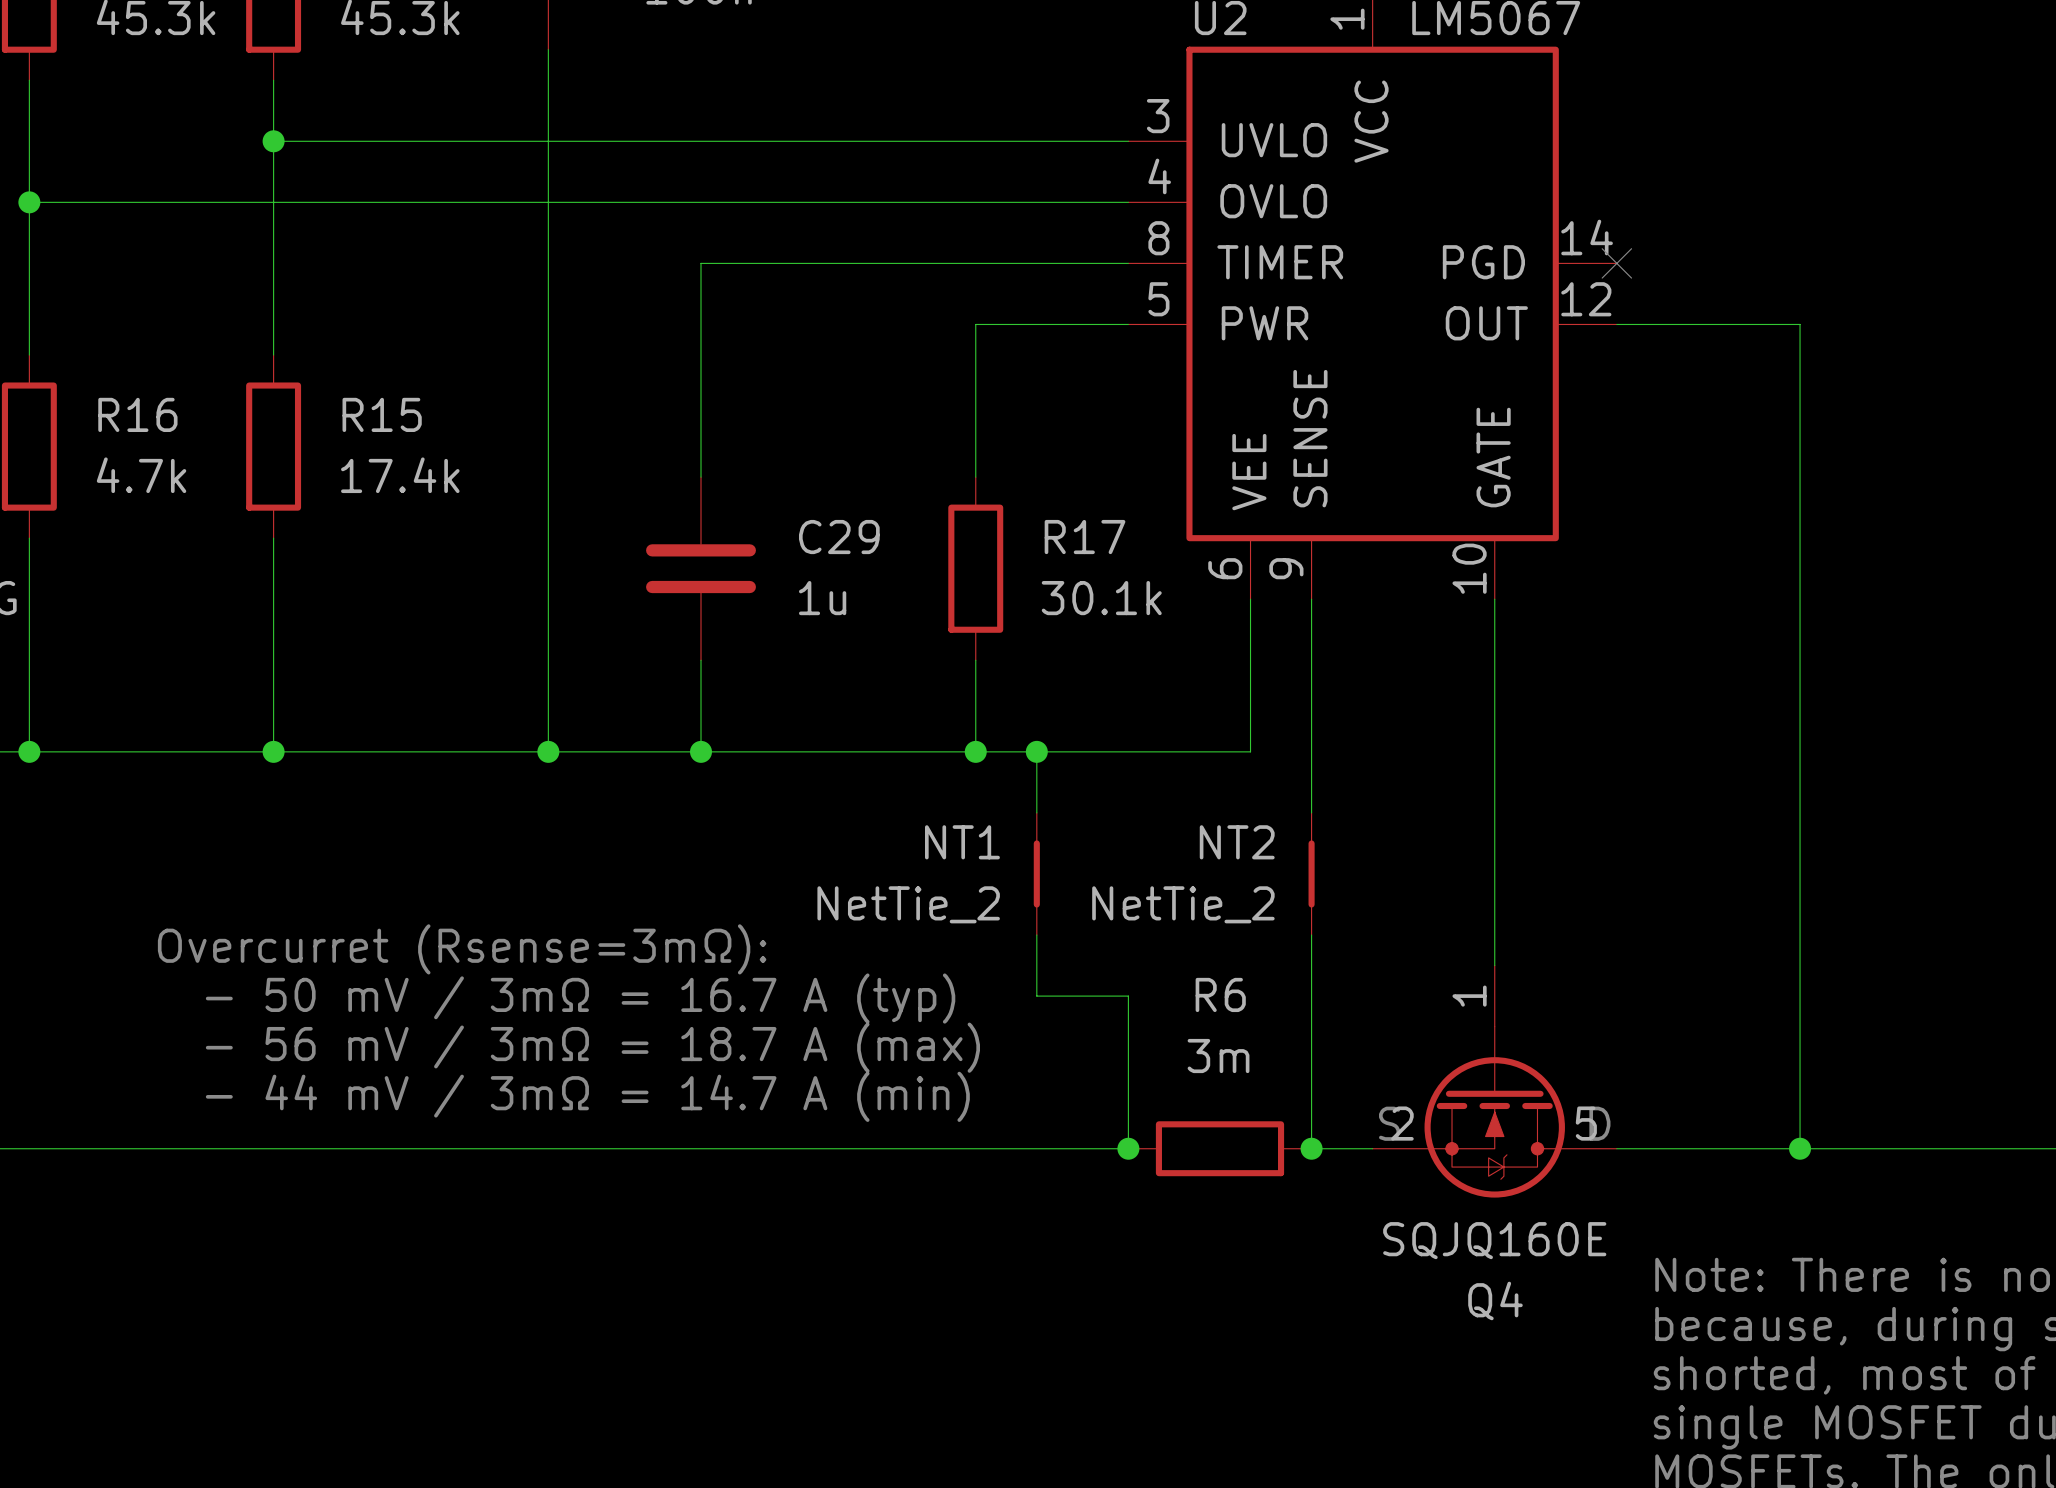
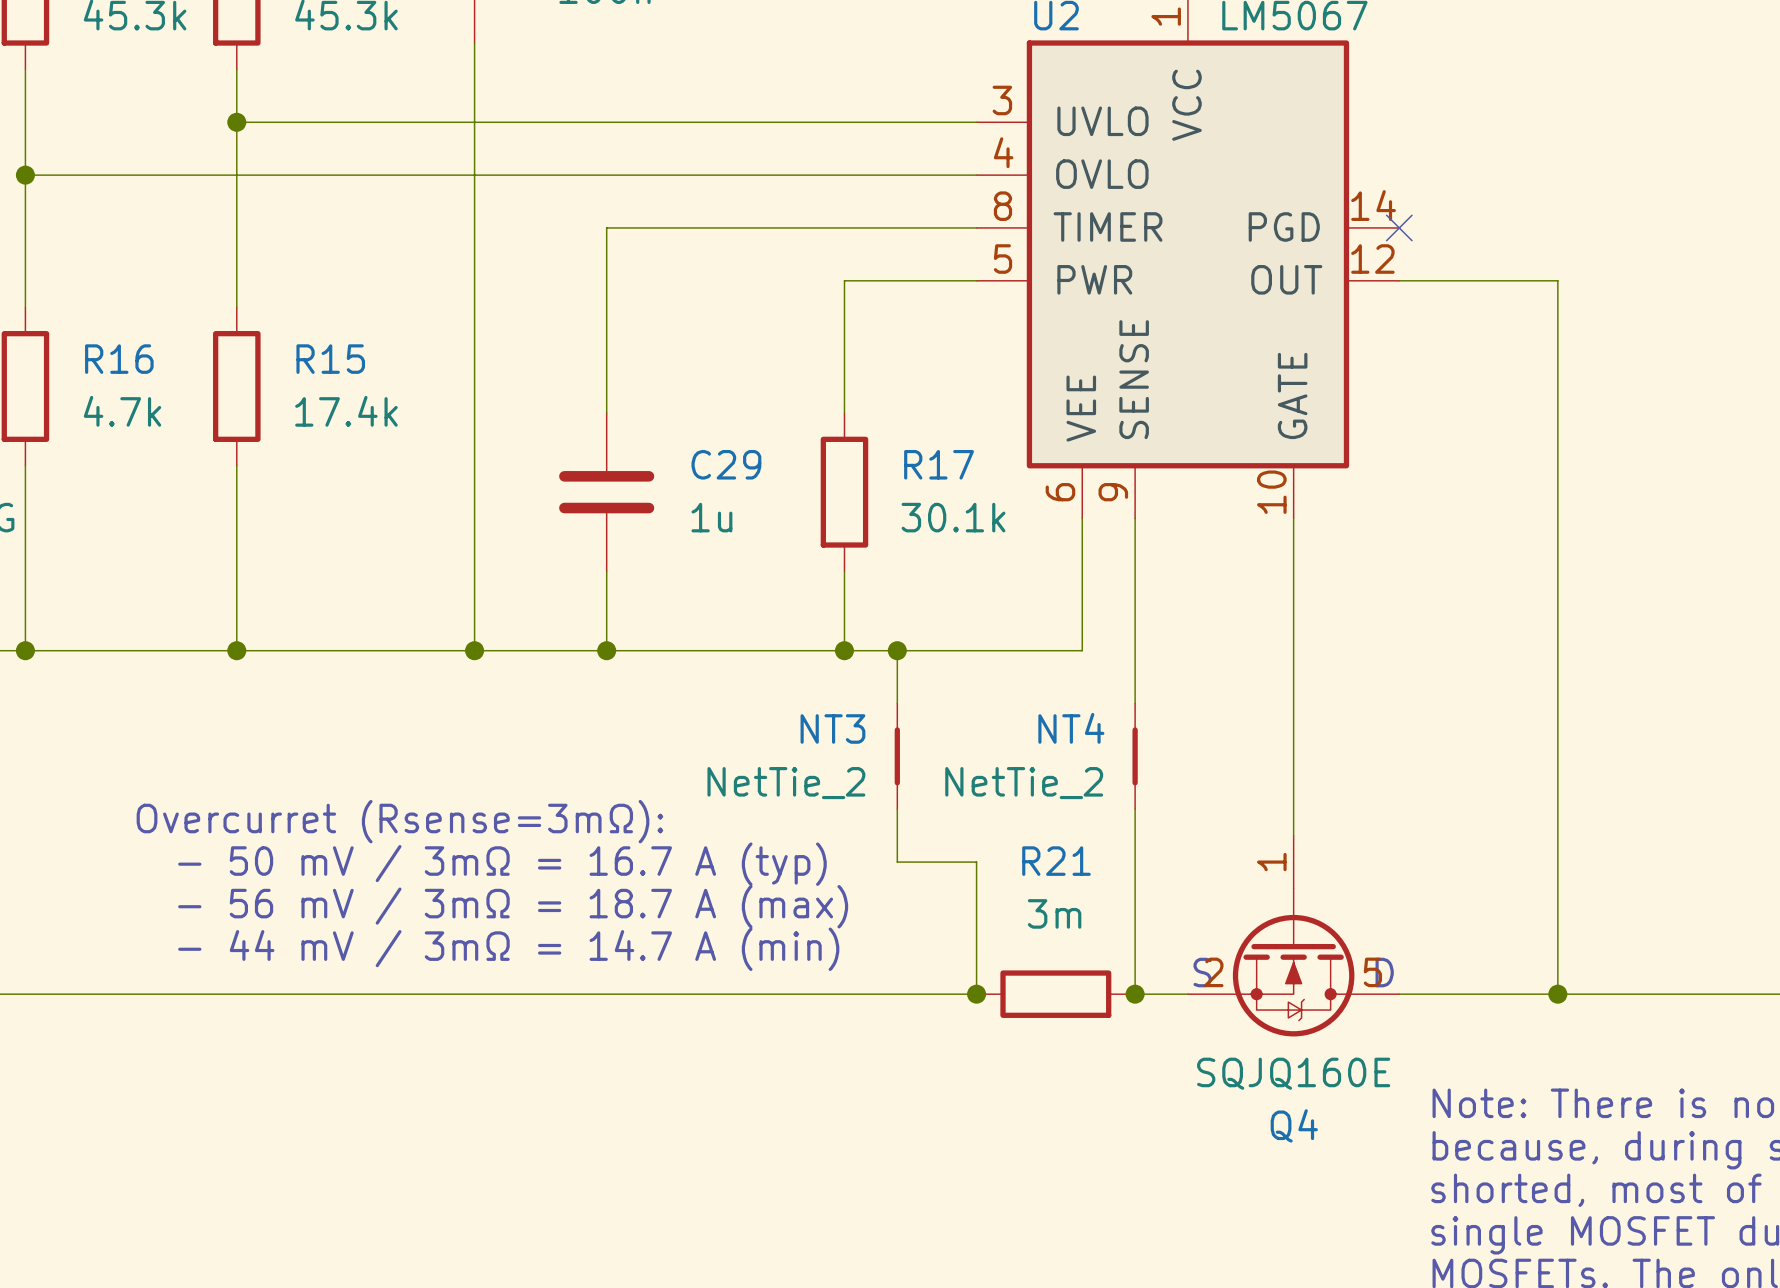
NT1 name: NT1 (962, 842) -> NT3 (832, 728)
NT2 name: NT2 (1237, 842) -> NT4 (1071, 728)
R6 name: R6 (1220, 994) -> R21 (1056, 861)

